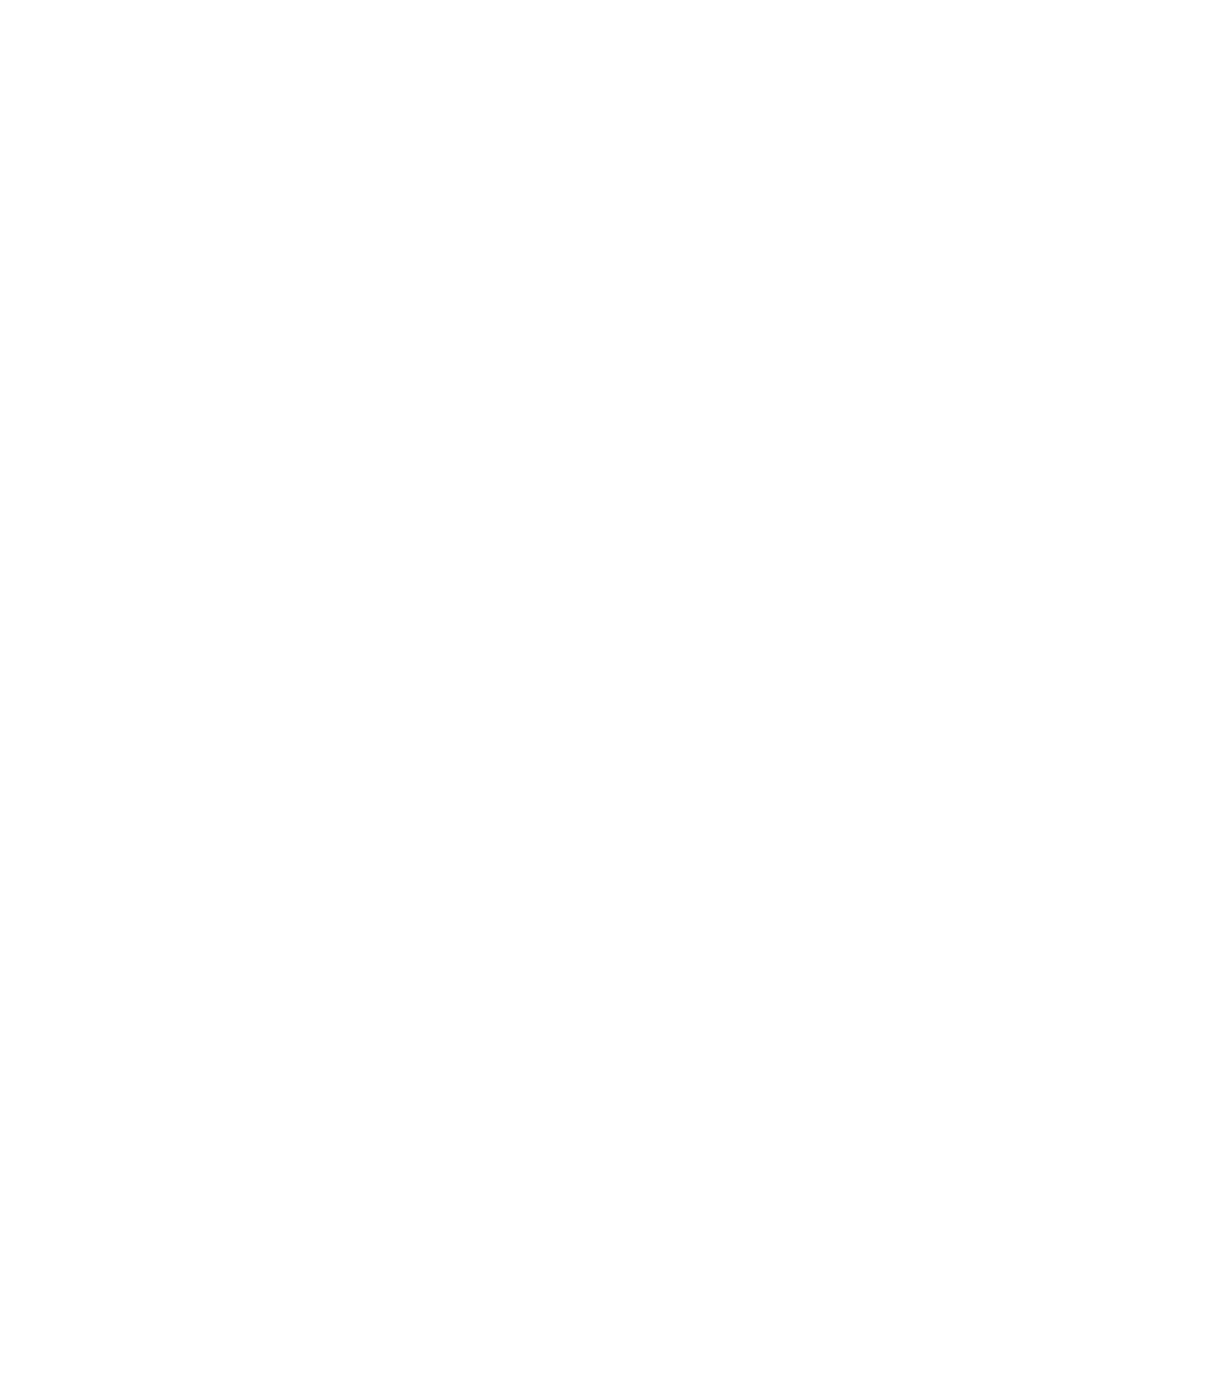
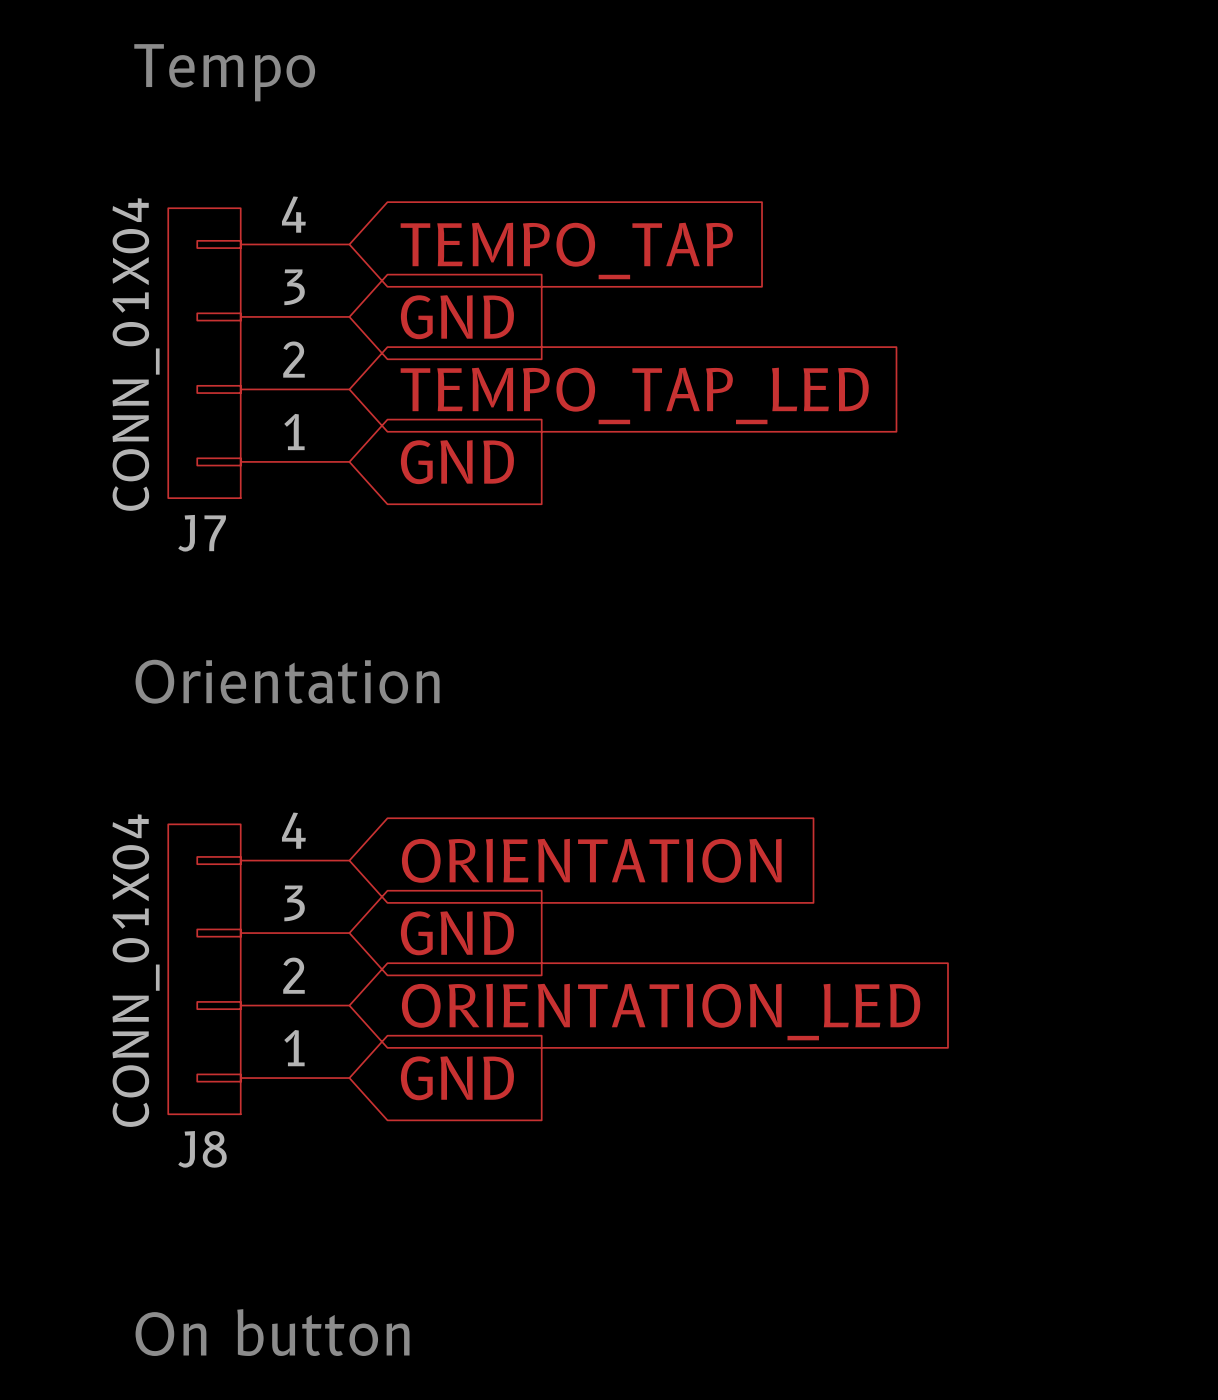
text: none -> Tempo (224, 72)
global label: none -> TEMPO_TAP (566, 250)
global label: none -> GND (457, 317)
J7: none -> CONN_01X04 (258, 353)
global label: none -> TEMPO_TAP_LED (634, 395)
global label: none -> GND (457, 462)
text: none -> Orientation (287, 681)
global label: none -> ORIENTATION (591, 860)
global label: none -> GND (457, 933)
J8: none -> CONN_01X04 (258, 969)
global label: none -> ORIENTATION_LED (661, 1012)
global label: none -> GND (457, 1078)
text: none -> On button (272, 1332)

